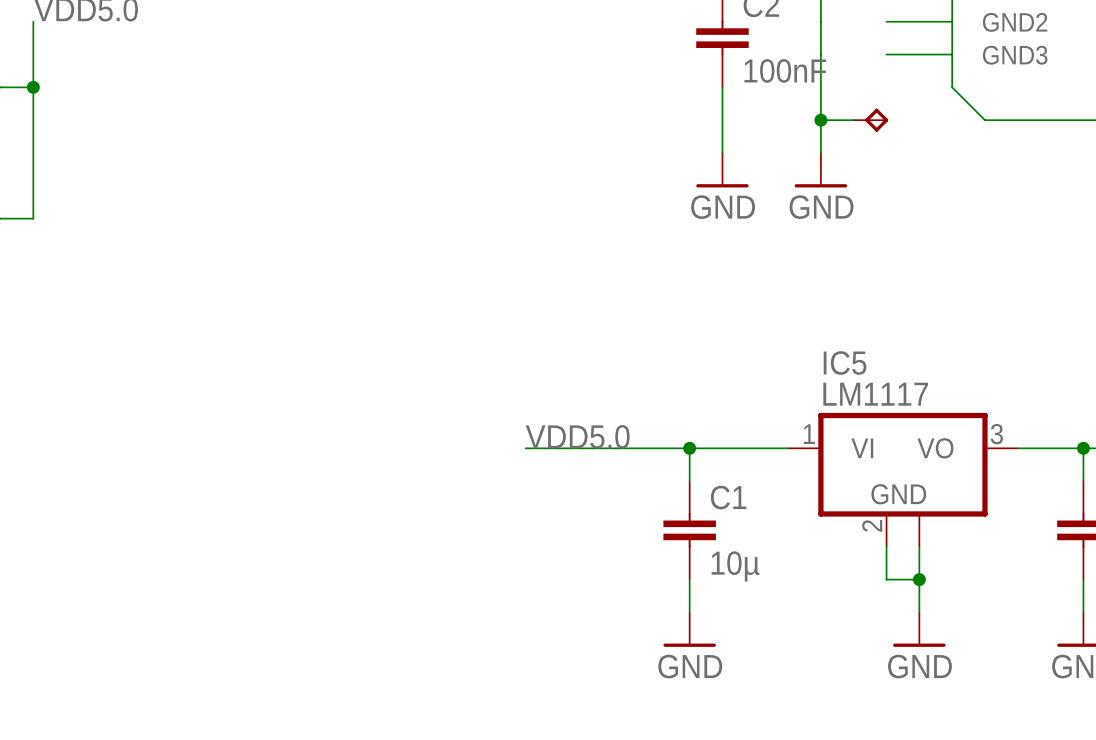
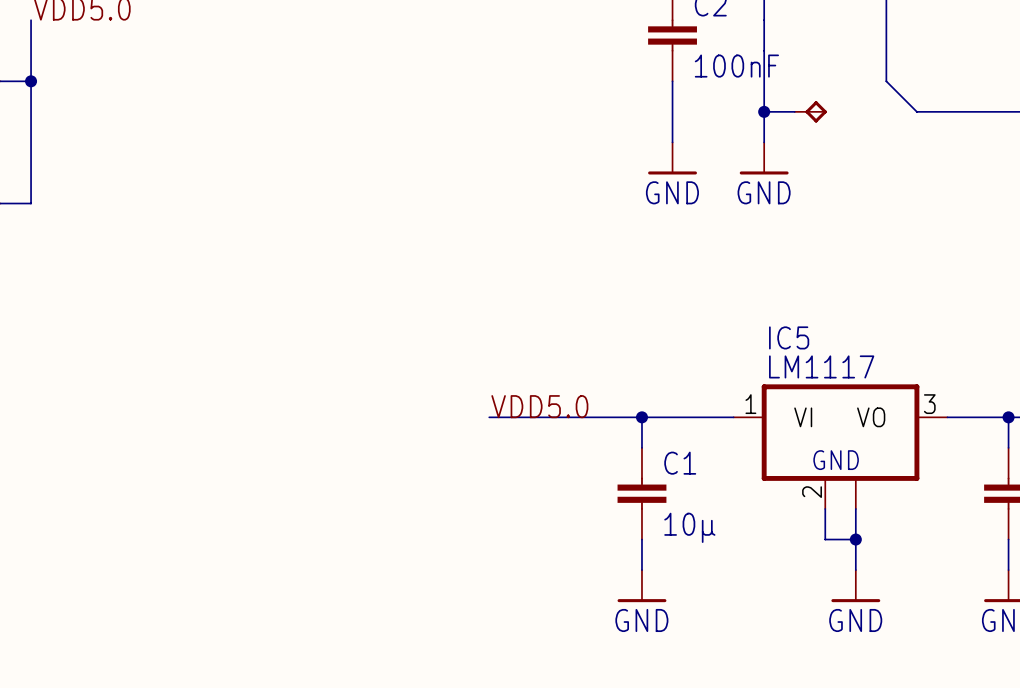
wire: (886, 21) (952, 21) -> none
text: GND2 (1015, 22) -> none
wire: (886, 54) (952, 54) -> none
text: GND3 (1015, 55) -> none

